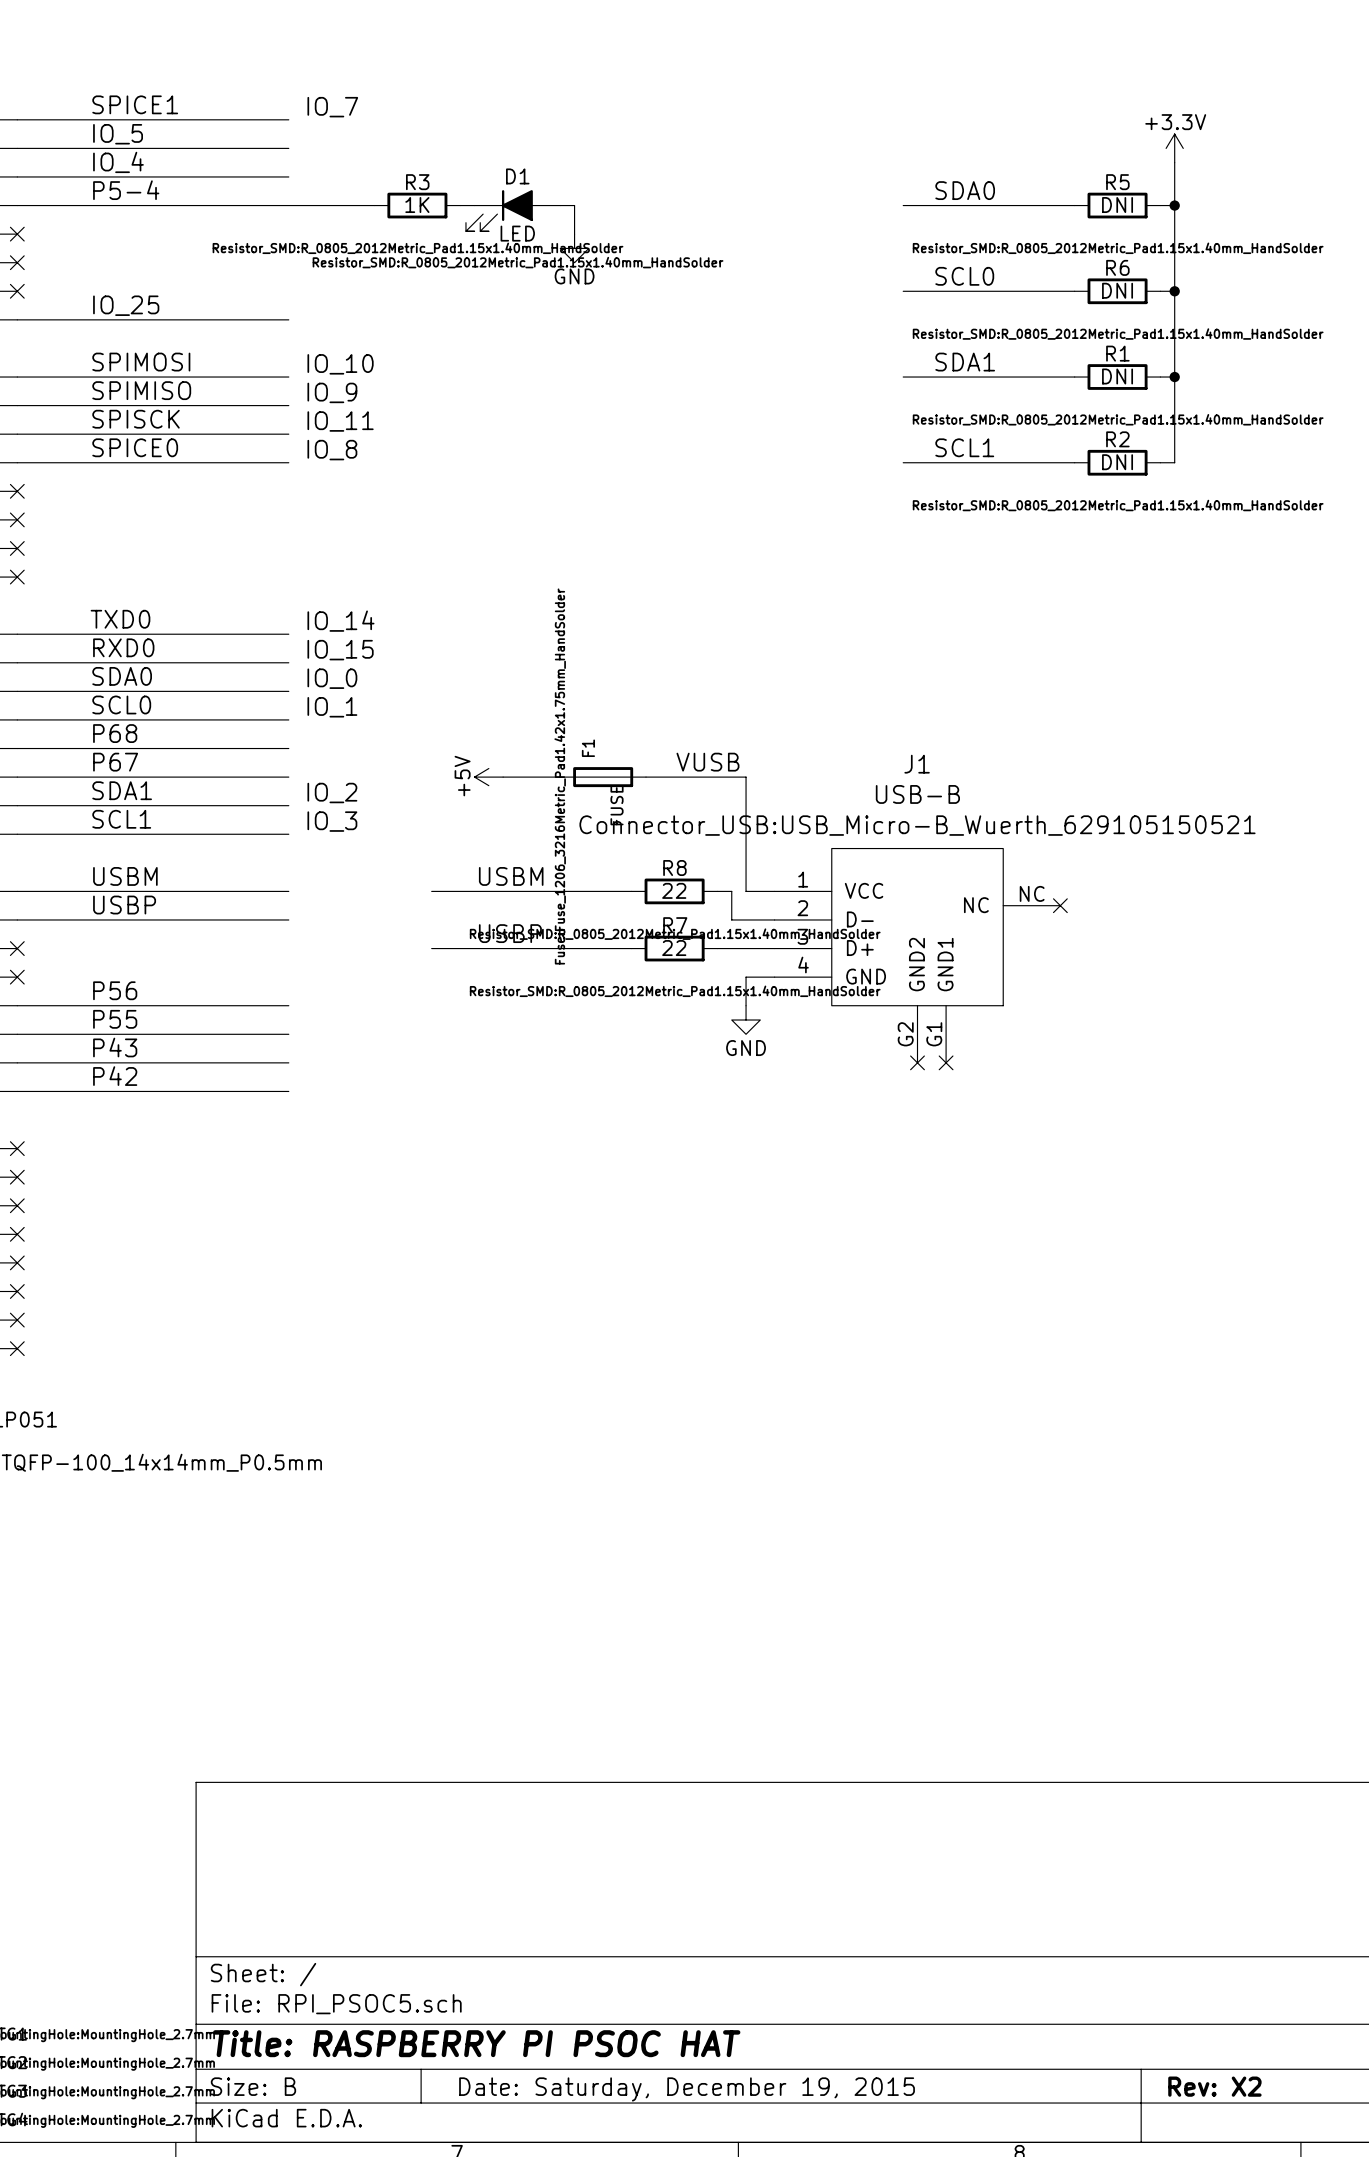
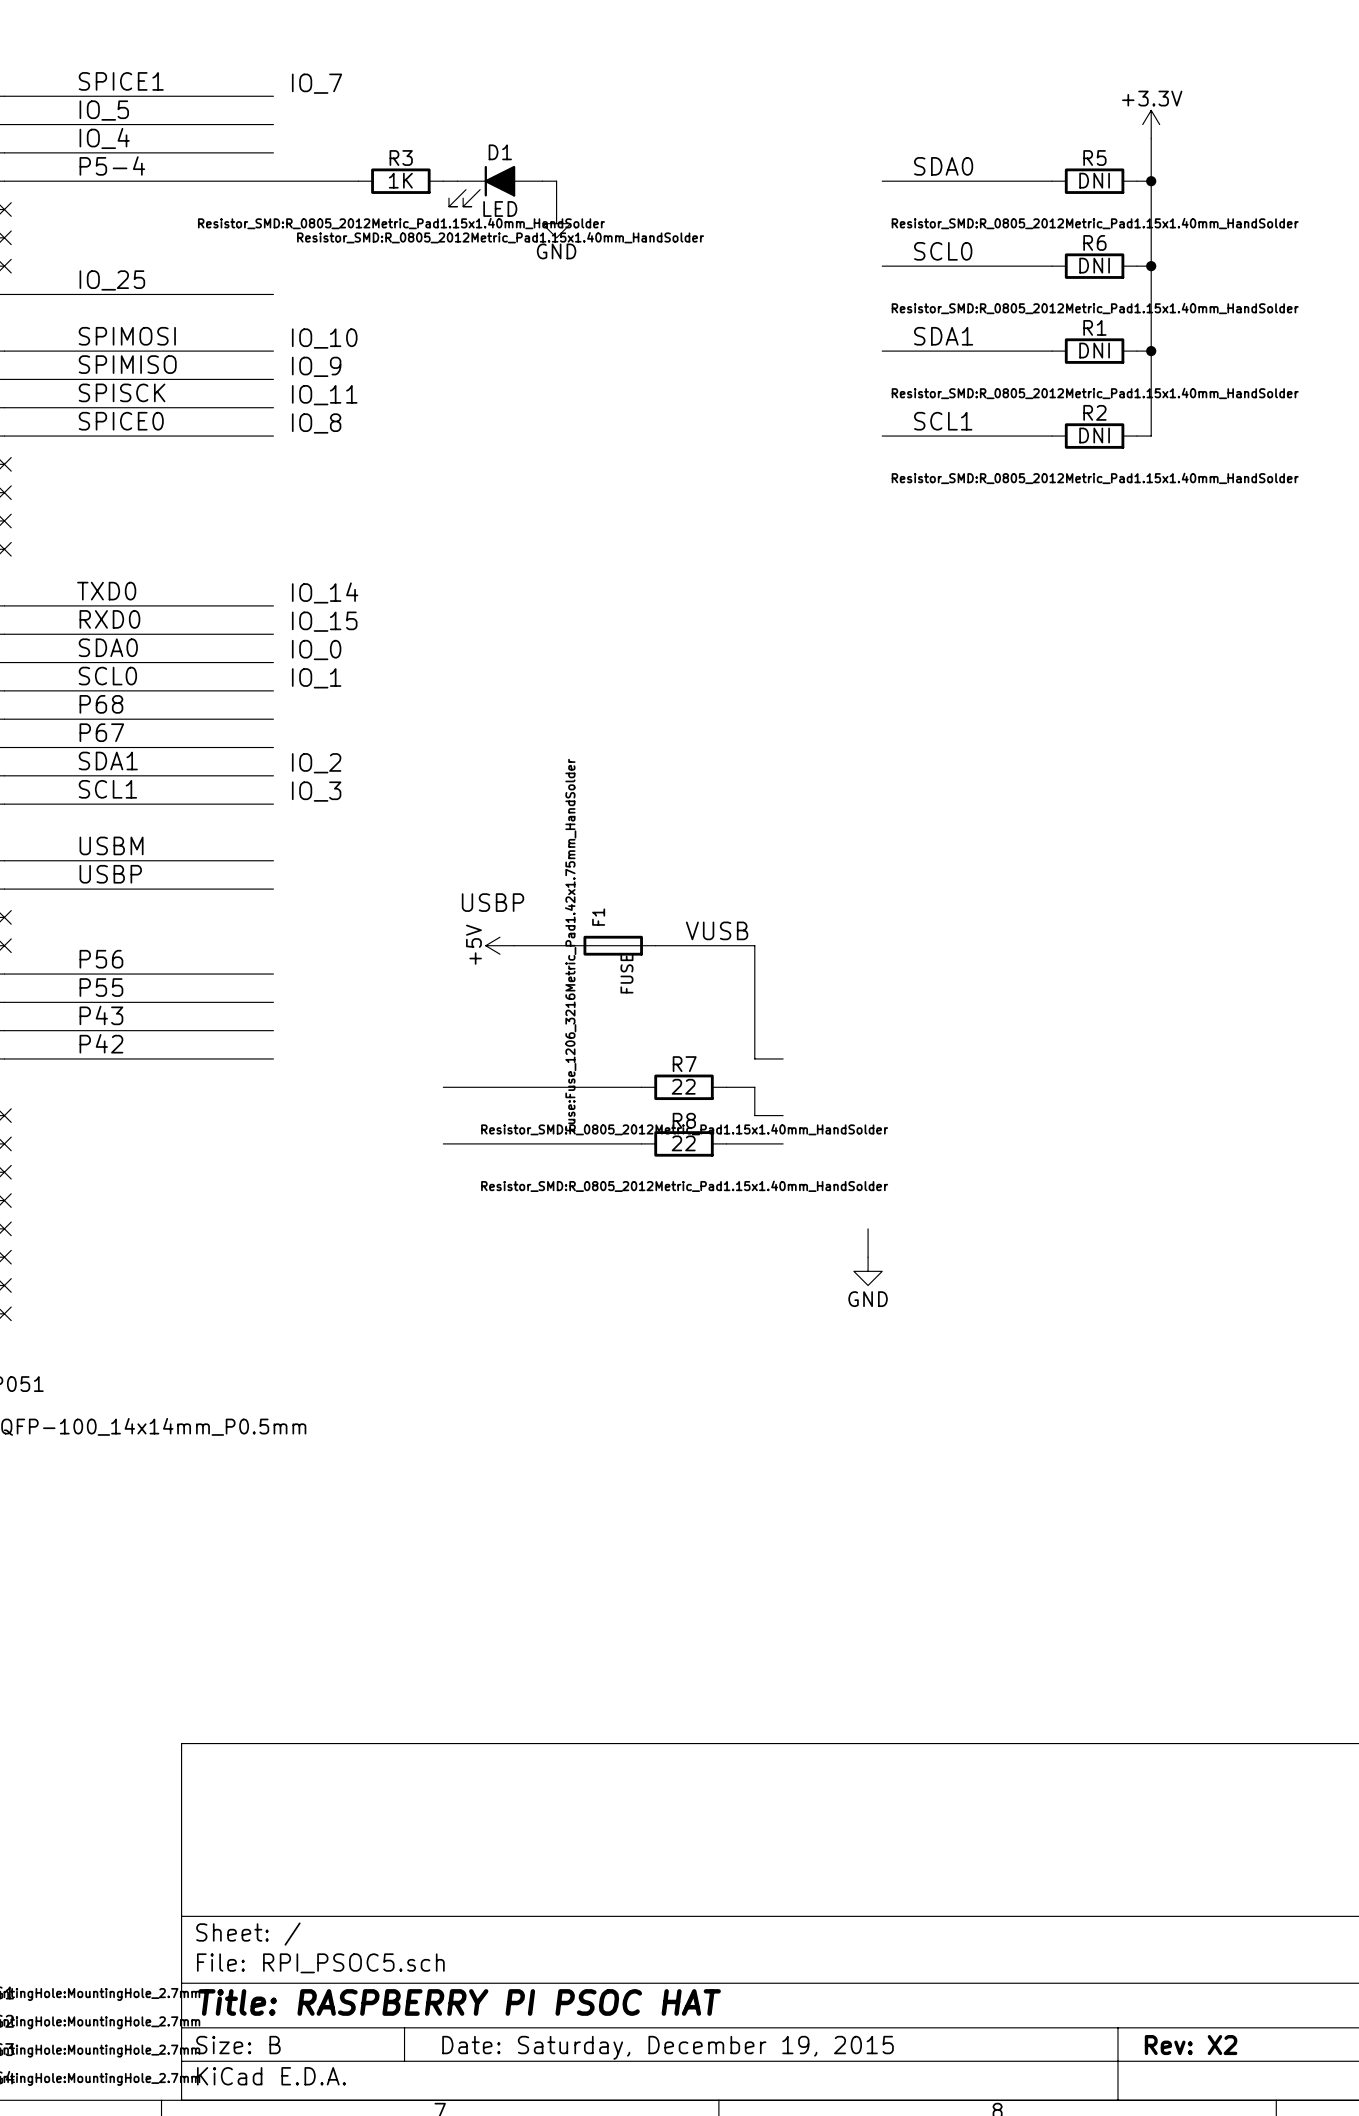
label position: VUSB (707, 762) -> VUSB (717, 930)
power symbol position: +5V (488, 777) -> +5V (499, 945)
wire: (503, 777) (560, 777) -> (514, 945) (570, 945)
F1 position: (603, 777) -> (613, 945)
wire: (646, 777) (746, 777) (746, 891) (774, 891) -> none
label: USBM (511, 876) -> none
wire: (431, 891) (631, 891) -> (443, 1087) (641, 1087)
R8 position: (674, 891) -> (684, 1143)
wire: (717, 891) (731, 891) (731, 919) (774, 919) -> none
no-connect mark: (1060, 905) -> none
wire: (431, 948) (631, 948) -> (443, 1143) (641, 1143)
R7 position: (674, 948) -> (684, 1087)
wire: (717, 948) (774, 948) -> (726, 1143) (783, 1143)
J1: USB-B (917, 955) -> none
wire: (746, 977) (746, 1005) -> (726, 945) (655, 945)
wire: none -> (754, 945) (754, 1058) (783, 1058)
power symbol: GND (746, 1020) -> none
no-connect mark: (917, 1062) -> none
no-connect mark: (946, 1062) -> none
wire: none -> (726, 1087) (754, 1087) (754, 1115) (783, 1115)
wire: none -> (868, 1228) (868, 1257)
power symbol: none -> GND (868, 1271)

